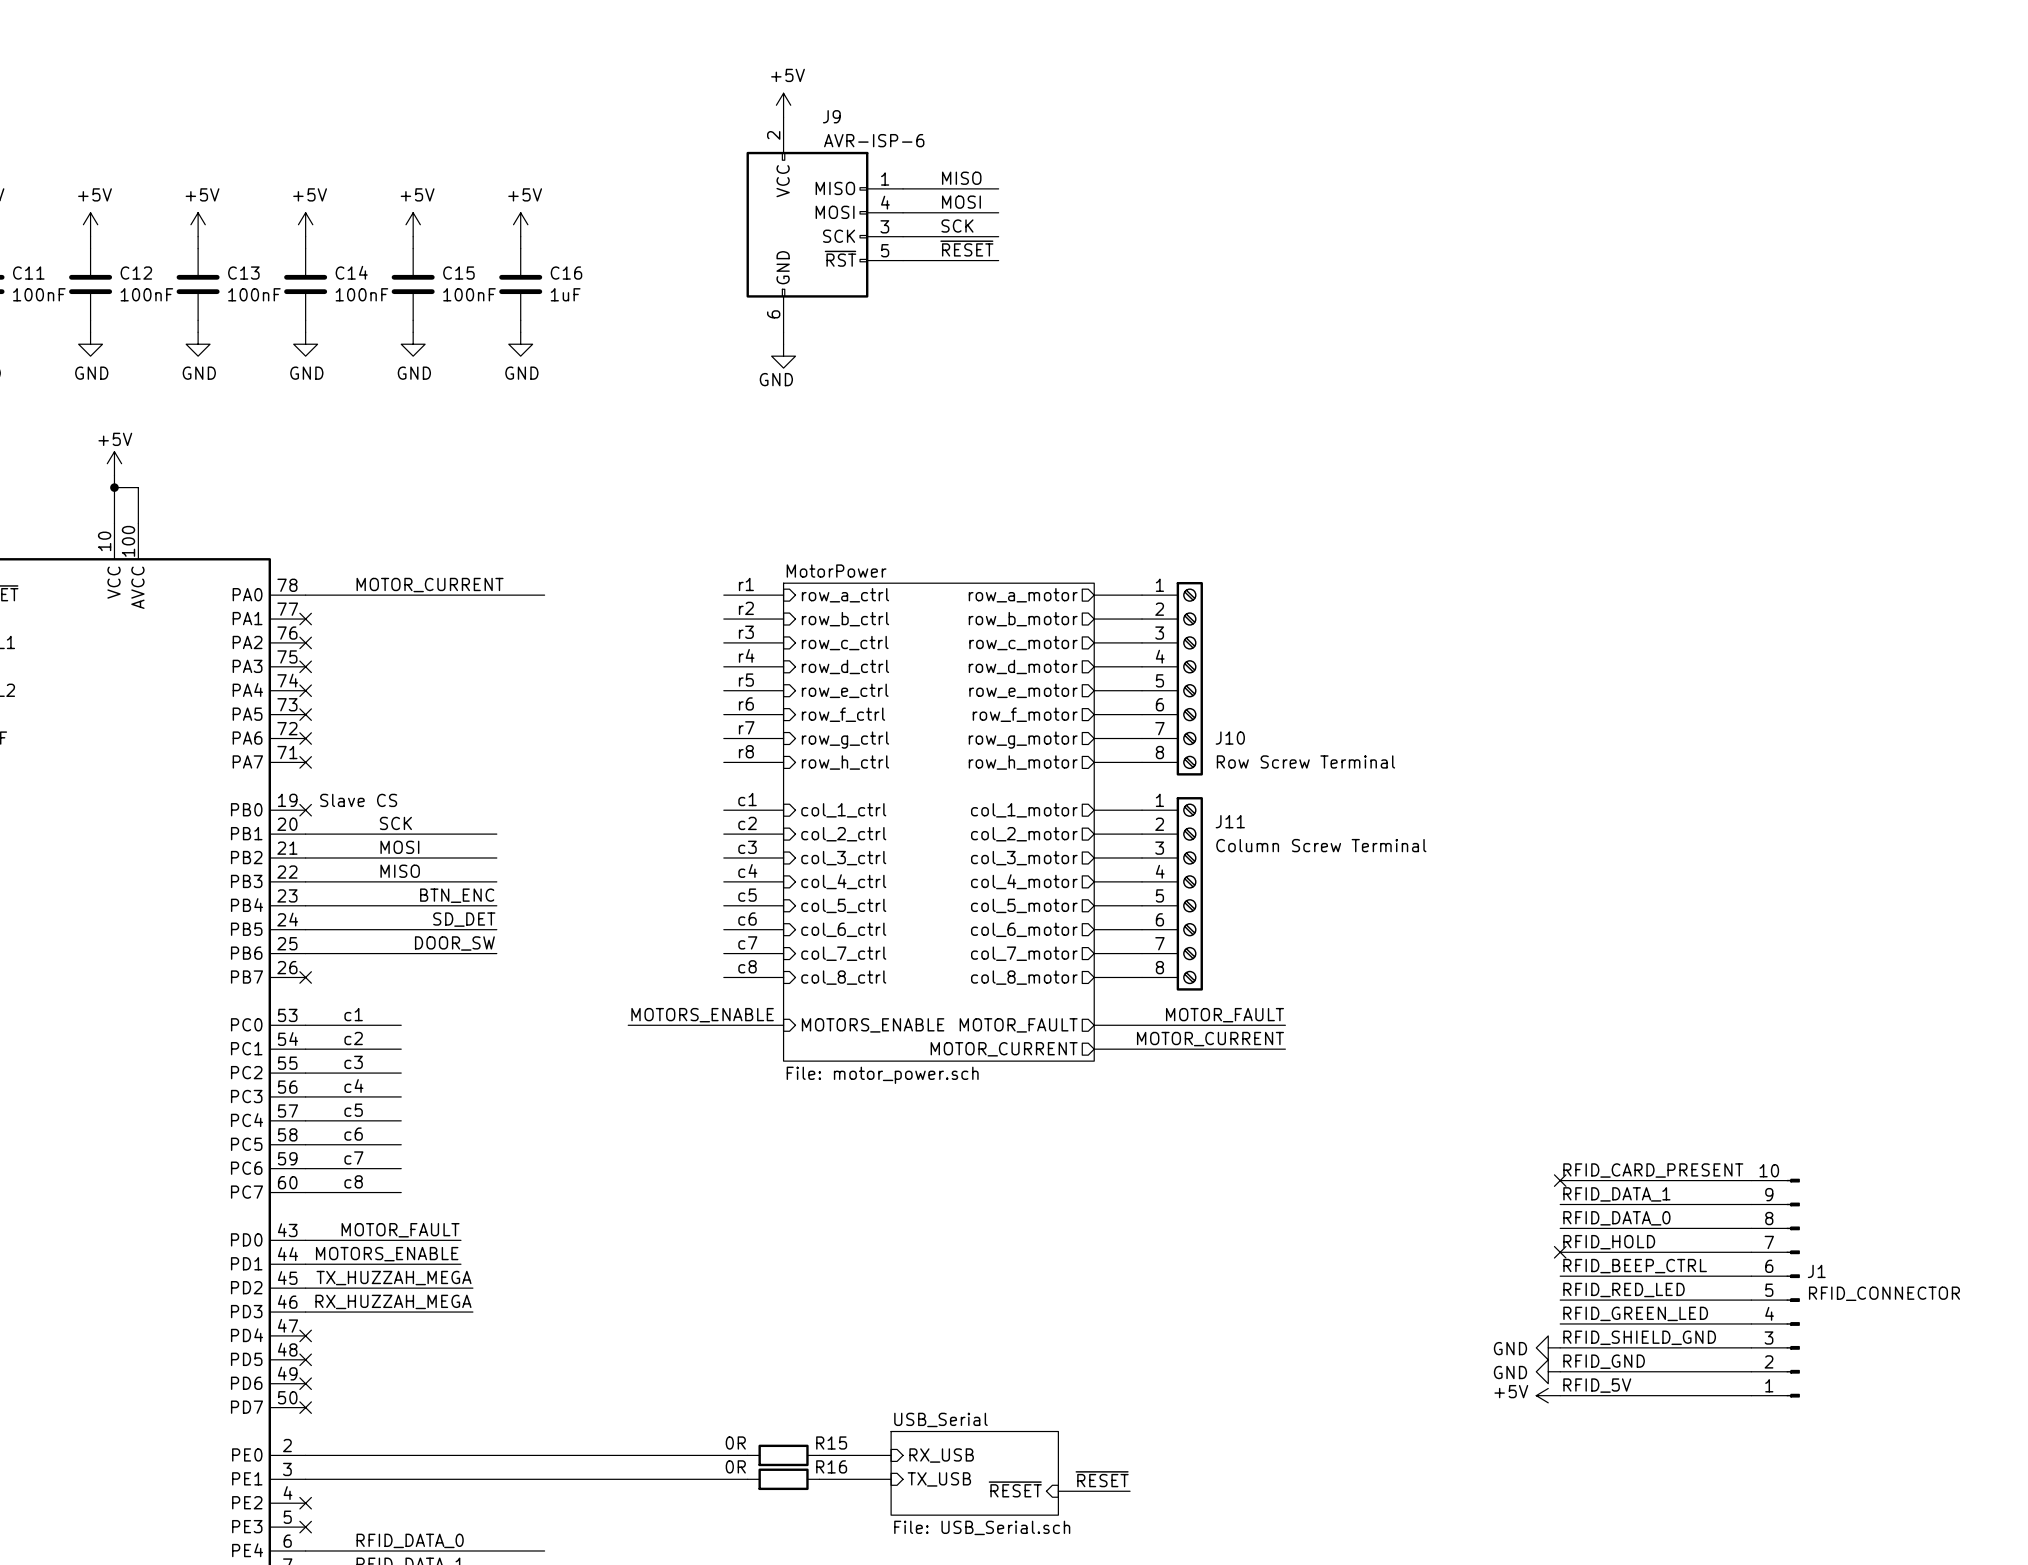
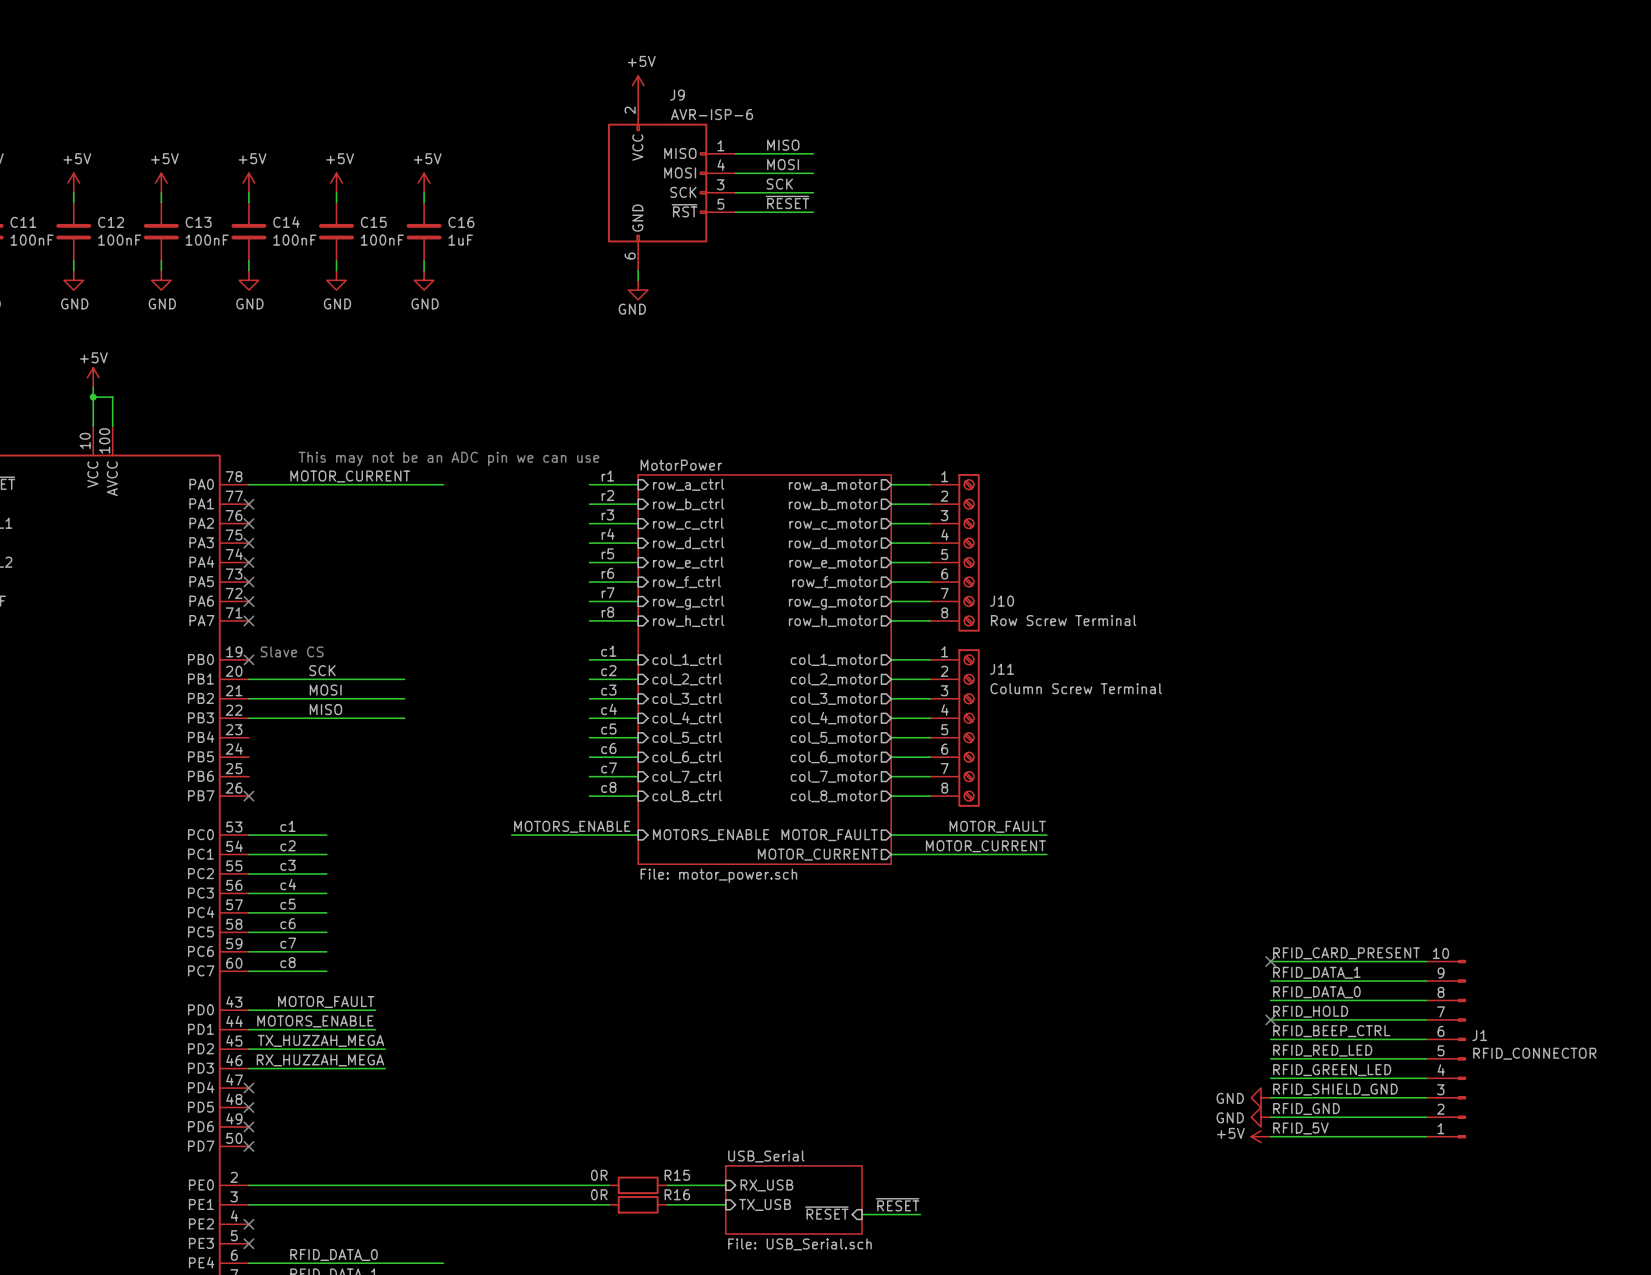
text: none -> This may not be an ADC pin we can use (448, 458)
label: BTN_ENC (457, 895) -> none
wire: (305, 905) (496, 905) -> none
label: SD_DET (464, 919) -> none
wire: (305, 929) (496, 929) -> none
label: DOOR_SW (454, 943) -> none
wire: (305, 953) (496, 953) -> none

